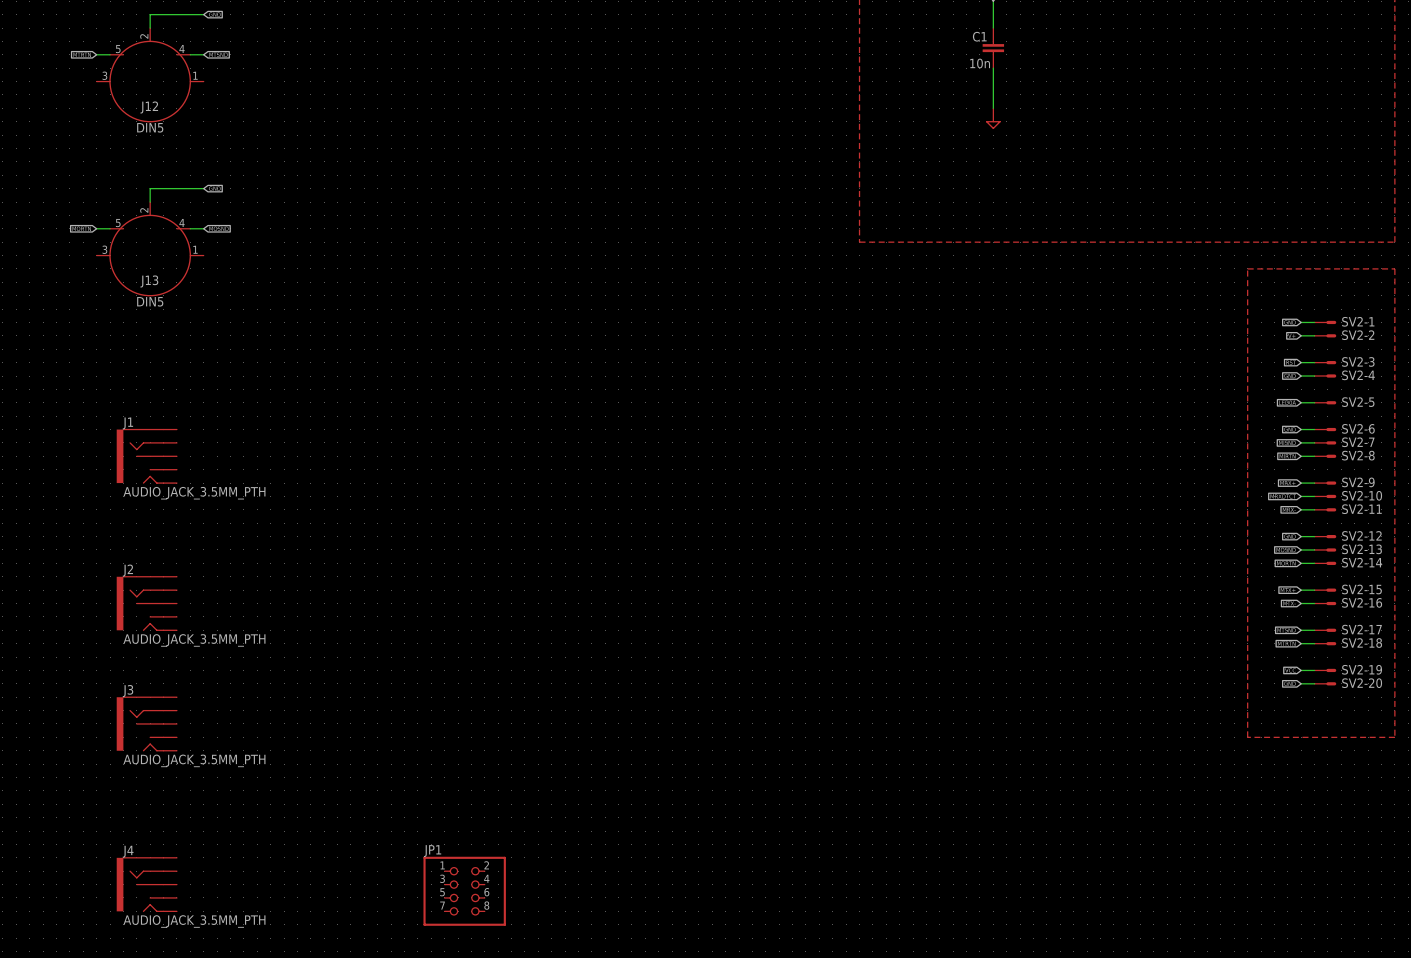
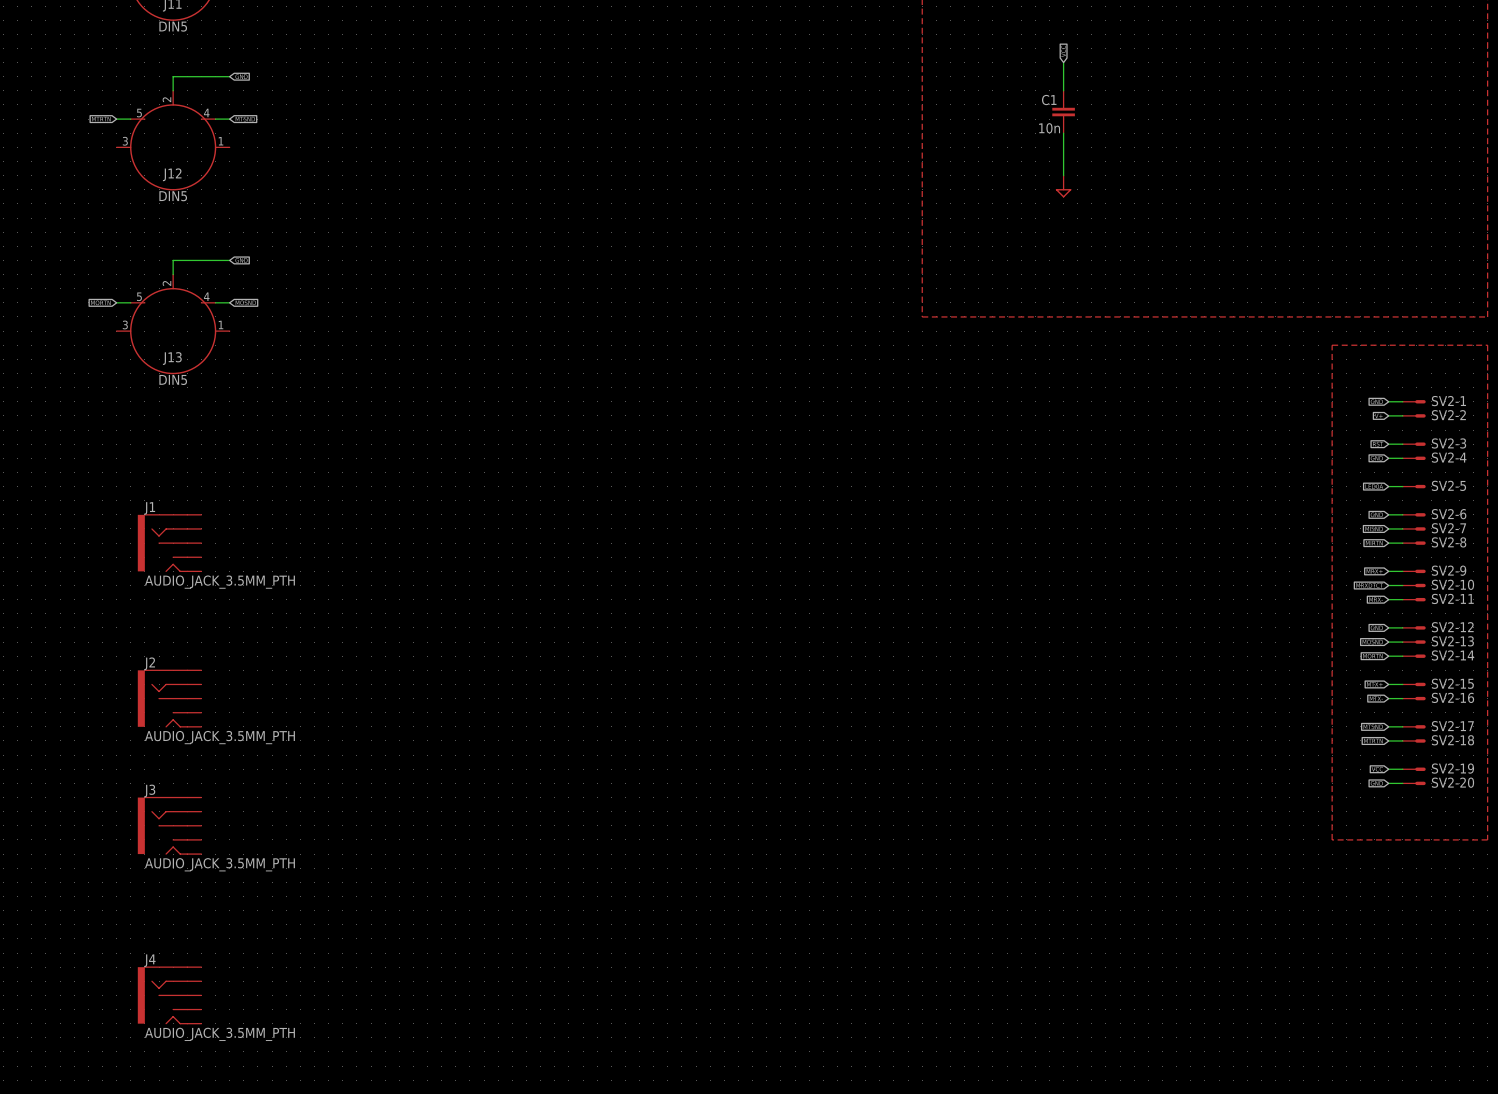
JP1: (464, 891) -> none

